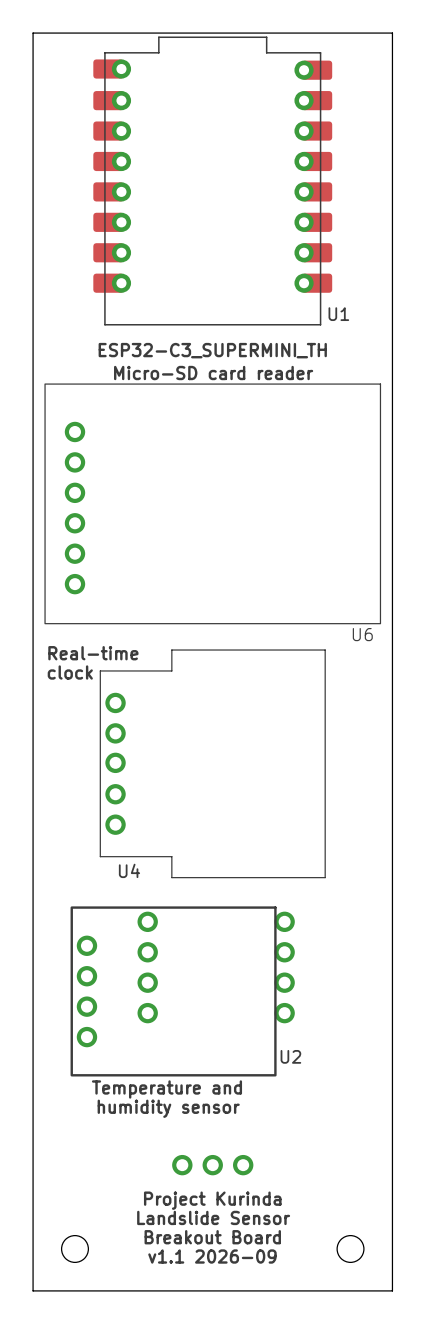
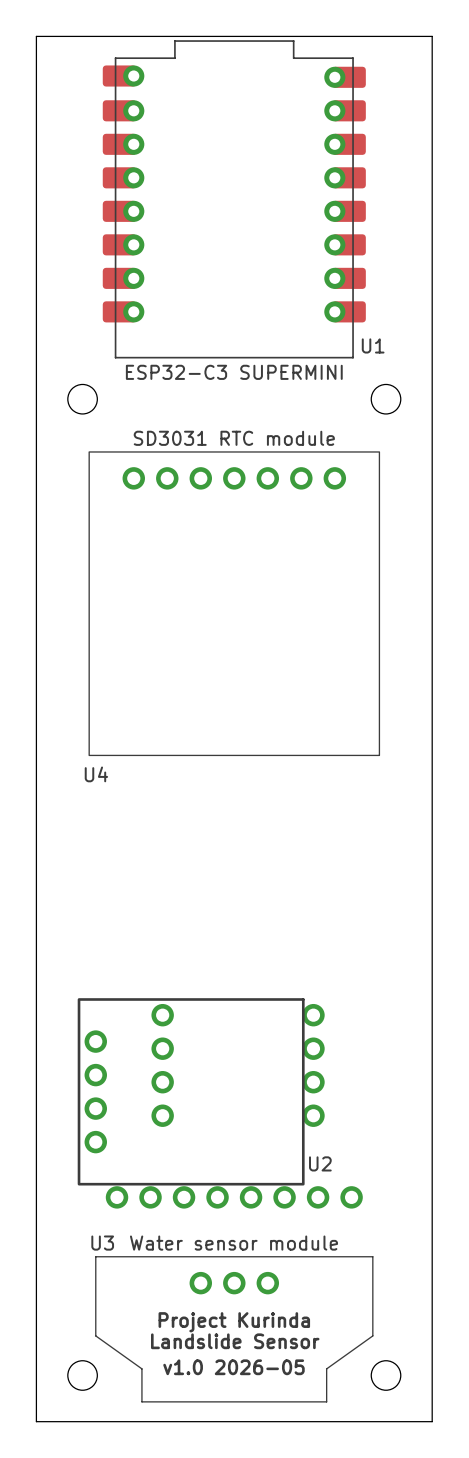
round board edge: none -> [67, 384, 98, 415]
round board edge: none -> [370, 384, 402, 415]
U1 value: ESP32-C3_SUPERMINI_TH (212, 350) -> ESP32-C3 SUPERMINI (234, 372)
text: Micro-SD card reader (213, 373) -> none
U4 value: none -> SD3031 RTC module (234, 438)
U6: (212, 503) -> none
U4 footprint: [99, 649, 326, 879] -> [88, 451, 381, 757]
text: Real-time (93, 653) -> none
text: clock (70, 672) -> none
U4 name position: U4 (129, 870) -> U4 (96, 774)
part: none -> (234, 1197)
text: Temperature and (166, 1089) -> none
text: humidity sensor (168, 1108) -> none
U3 side: bottom (212, 1165) -> top (234, 1329)
text: Breakout Board (212, 1237) -> v1.0 2026-05 (233, 1367)
text: v1.1 2026-09 (212, 1256) -> none

